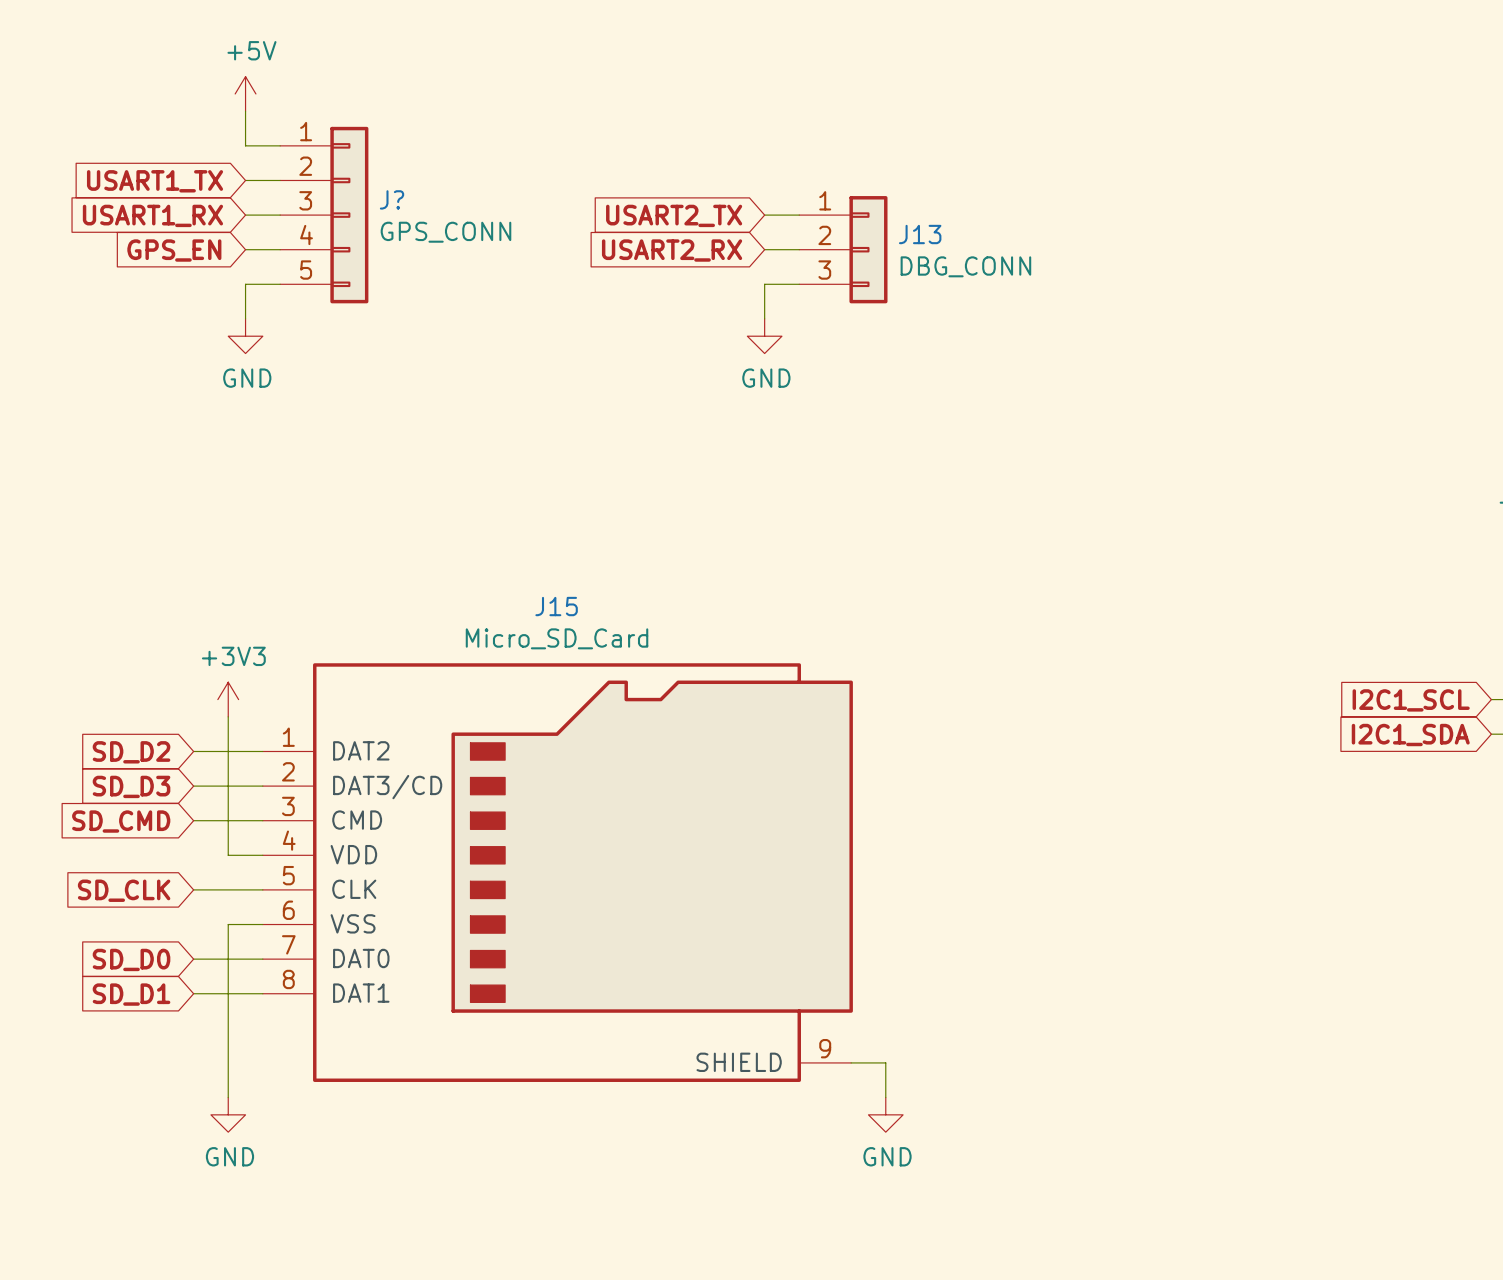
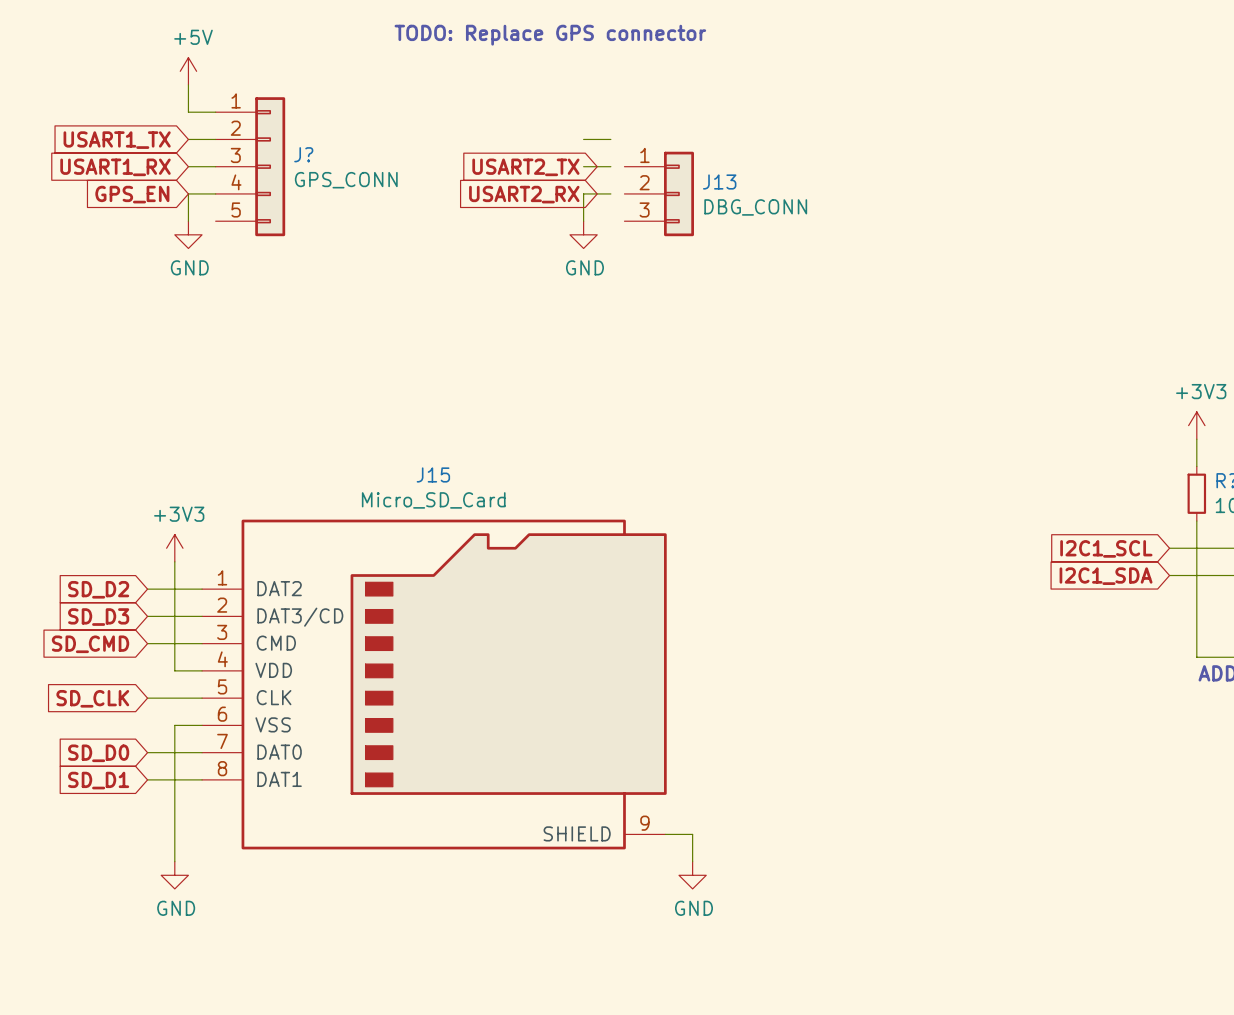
text: none -> TODO: Replace GPS connector (550, 35)
wire: none -> (583, 139) (610, 139)
wire: (781, 215) (799, 215) -> (583, 166) (597, 166)
wire: none -> (188, 193) (188, 221)
wire: none -> (597, 193) (583, 193) (583, 221)
wire: (781, 249) (799, 249) -> none
wire: (280, 284) (245, 284) (245, 318) -> none
wire: (799, 284) (764, 284) (764, 318) -> none
power symbol position: GND (245, 336) -> GND (188, 234)
power symbol position: GND (764, 336) -> GND (583, 234)

